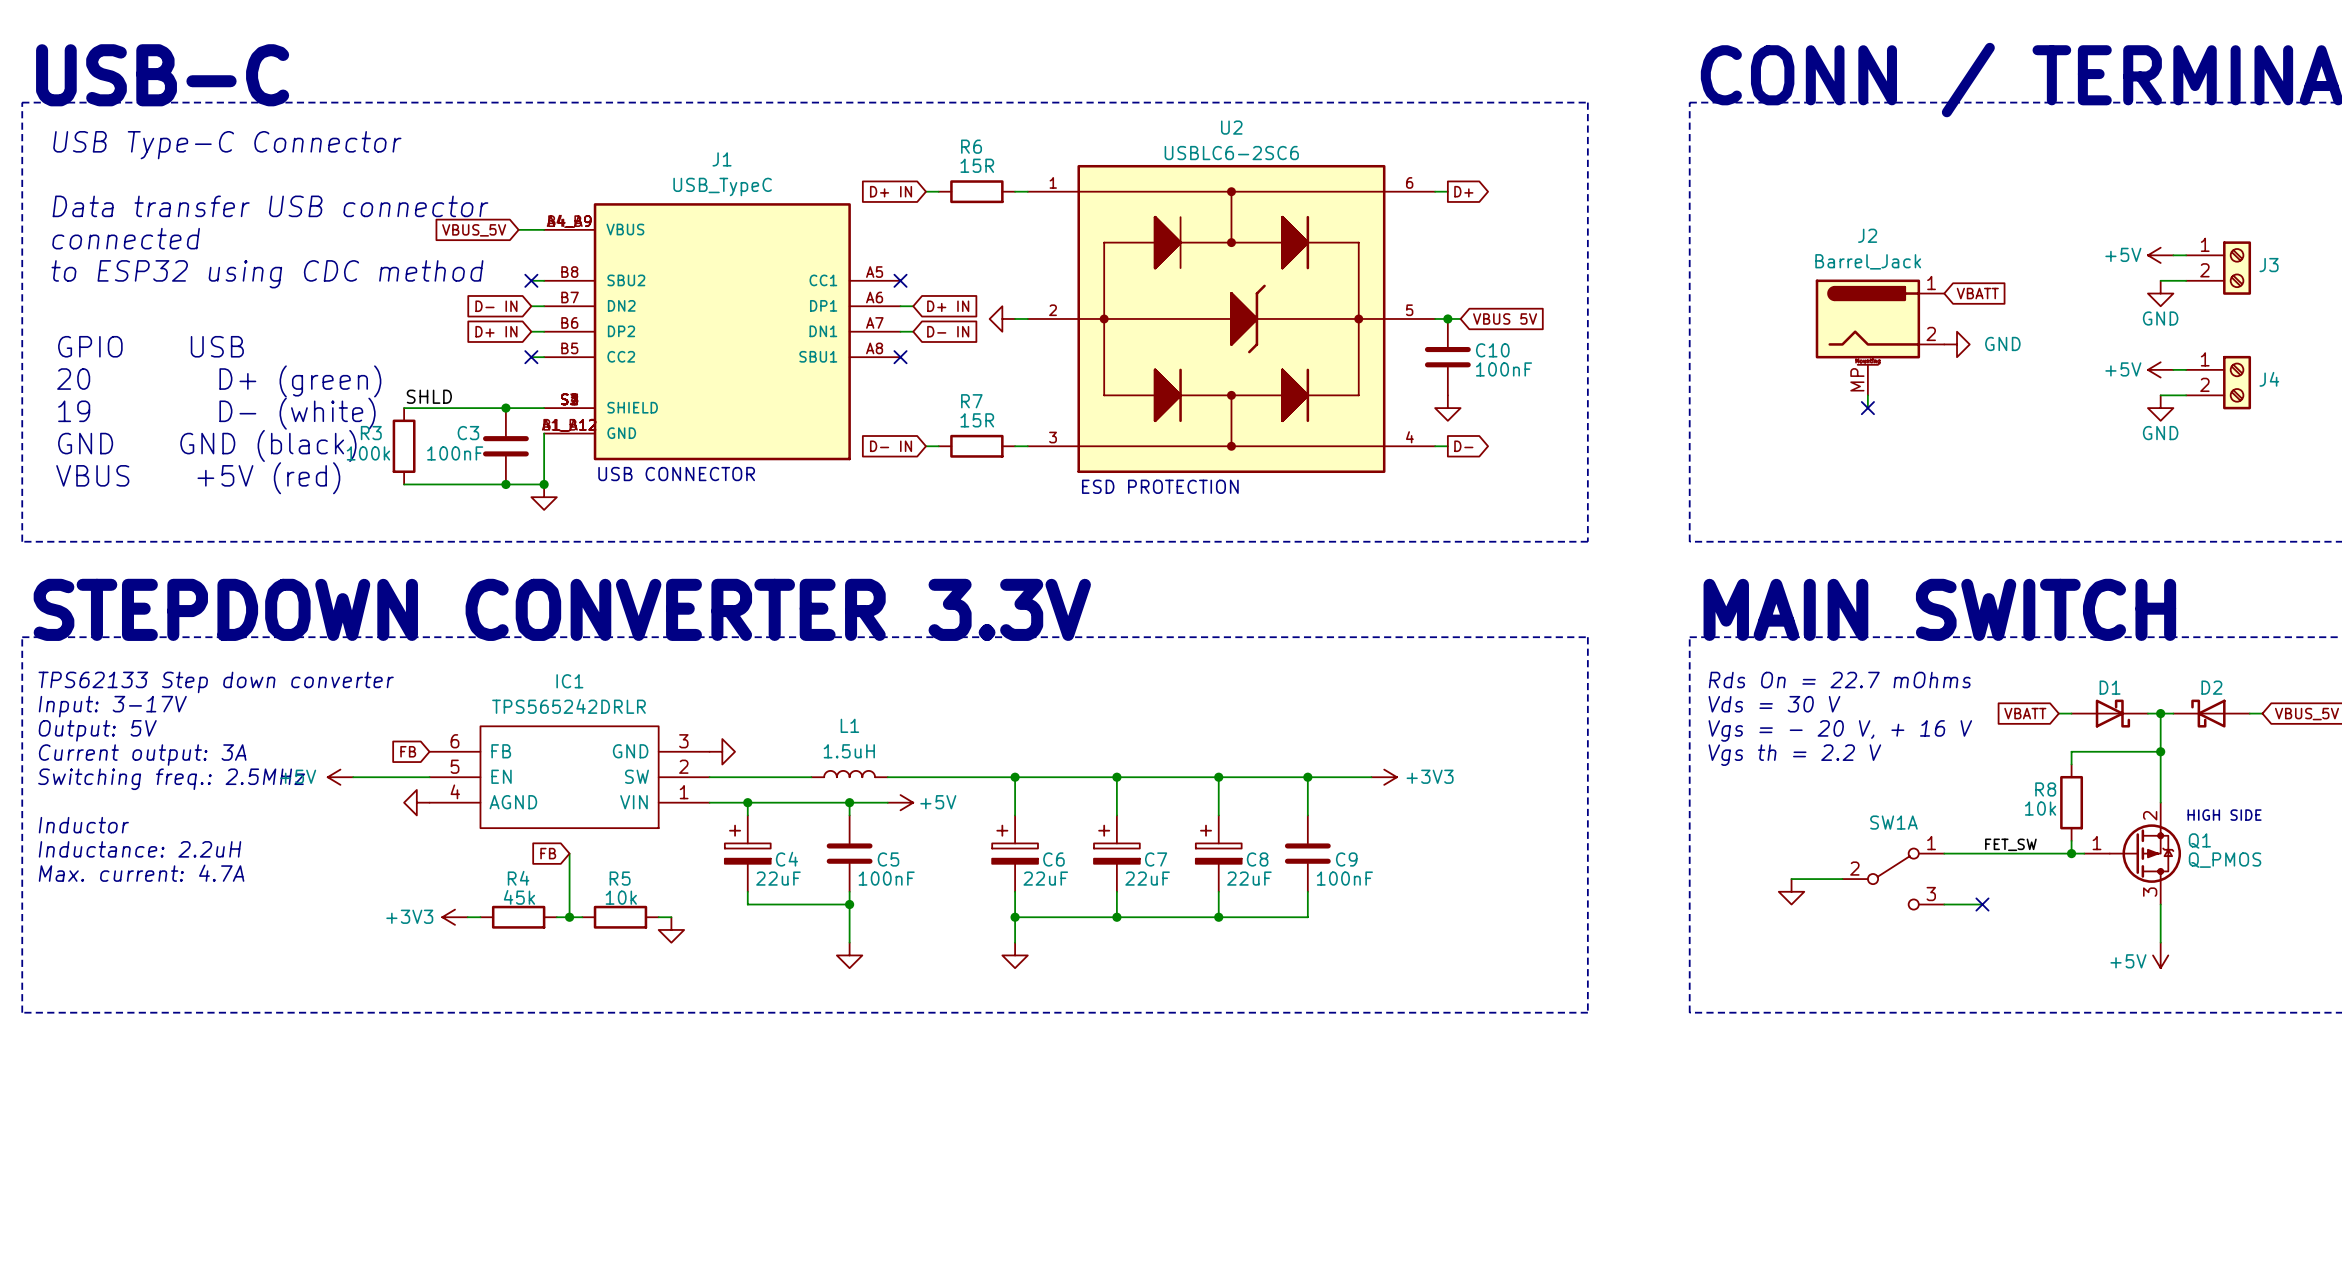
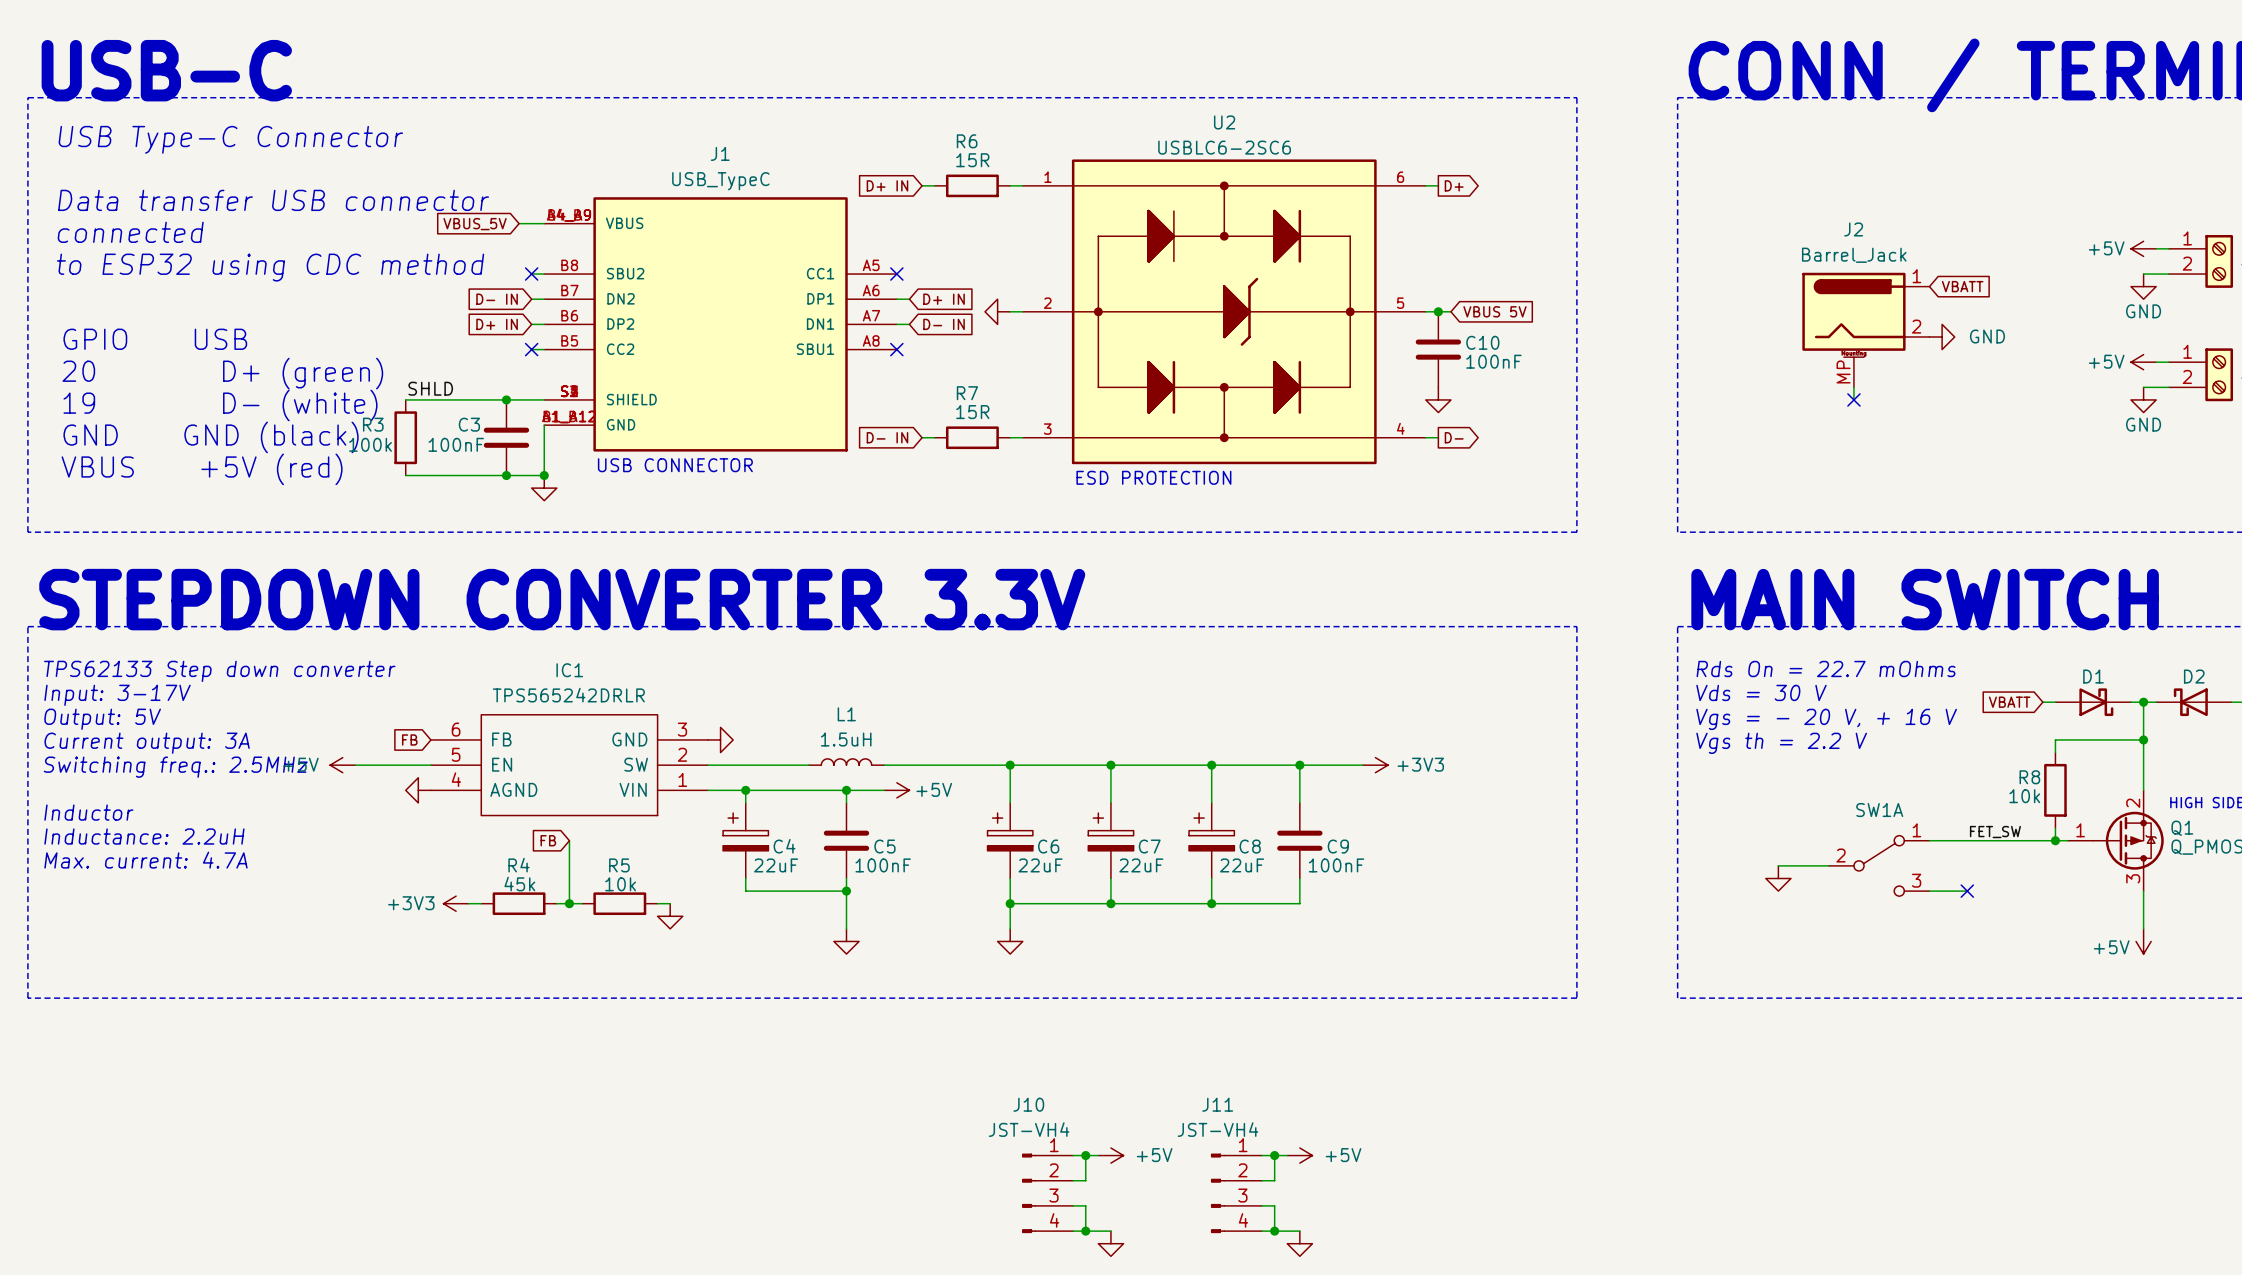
wire: none -> (1073, 1155) (1098, 1155)
wire: none -> (1085, 1155) (1085, 1180) (1073, 1180)
junction: none -> (1085, 1155)
power symbol: none -> +5V (1110, 1155)
wire: none -> (1262, 1155) (1287, 1155)
wire: none -> (1274, 1155) (1274, 1180) (1262, 1180)
junction: none -> (1274, 1155)
power symbol: none -> +5V (1299, 1155)
J10: none -> JST-VH4 (1047, 1193)
J11: none -> JST-VH4 (1236, 1193)
wire: none -> (1073, 1205) (1085, 1205) (1085, 1231)
wire: none -> (1262, 1205) (1274, 1205) (1274, 1231)
wire: none -> (1073, 1231) (1110, 1231)
junction: none -> (1085, 1231)
wire: none -> (1262, 1231) (1299, 1231)
junction: none -> (1274, 1231)
power symbol: none -> (1110, 1243)
power symbol: none -> (1299, 1243)

